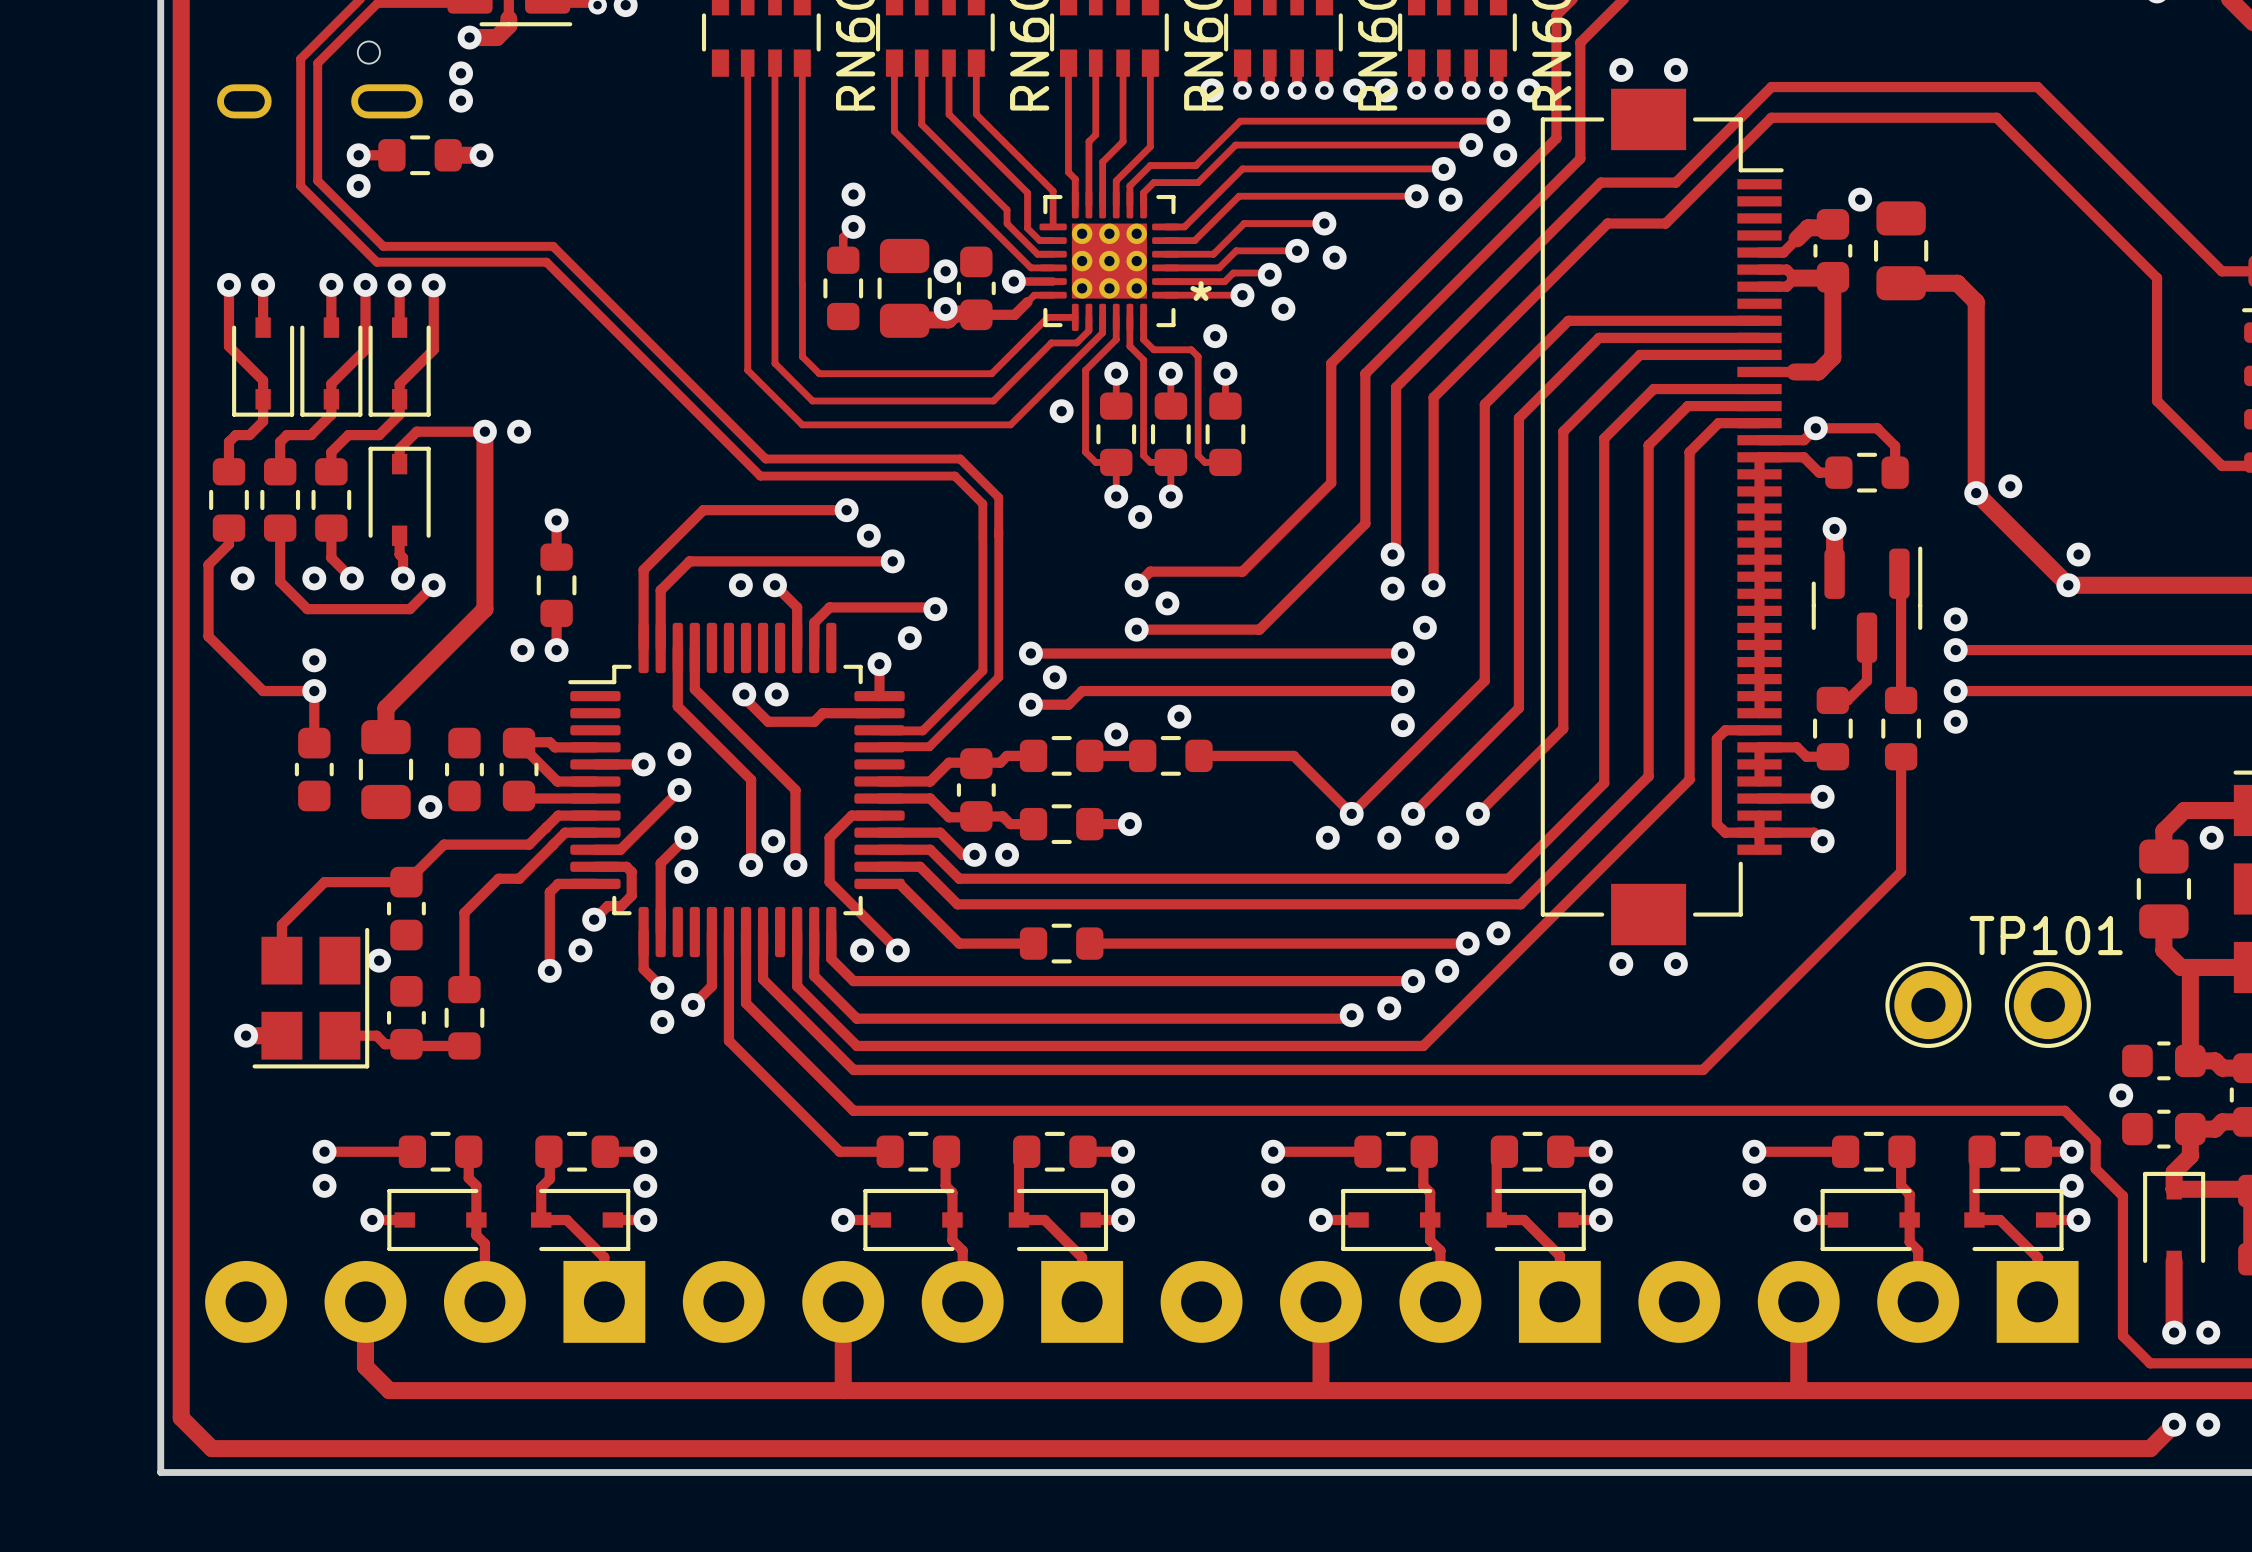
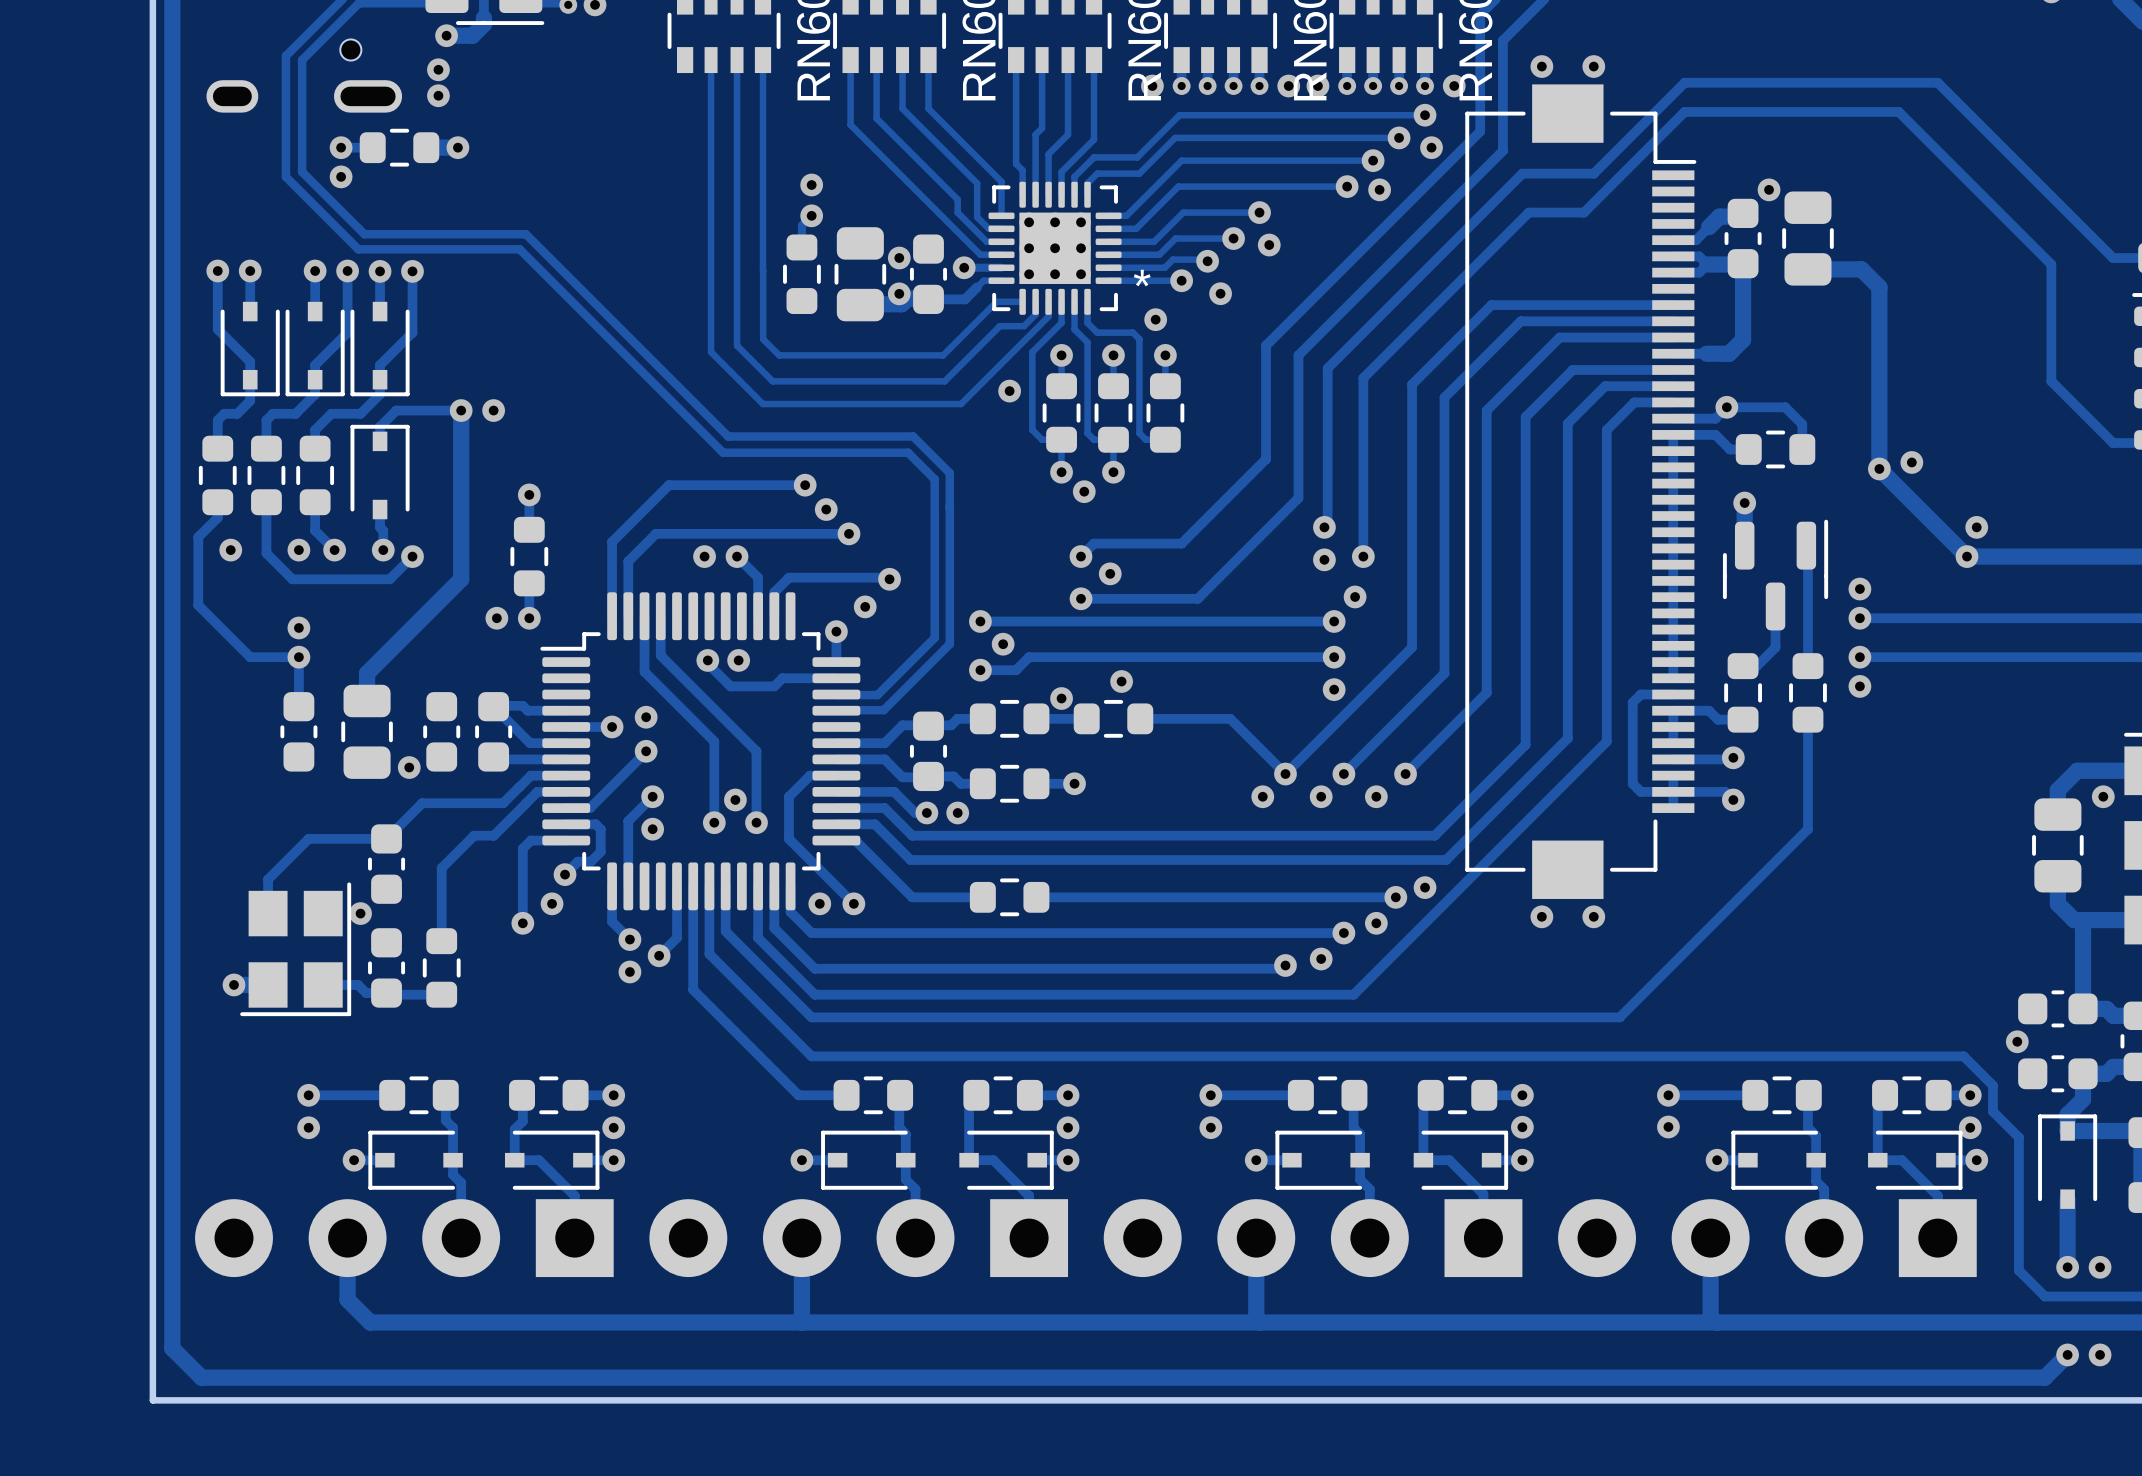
part: (1928, 1005) -> none
TP101: (2047, 1005) -> none

